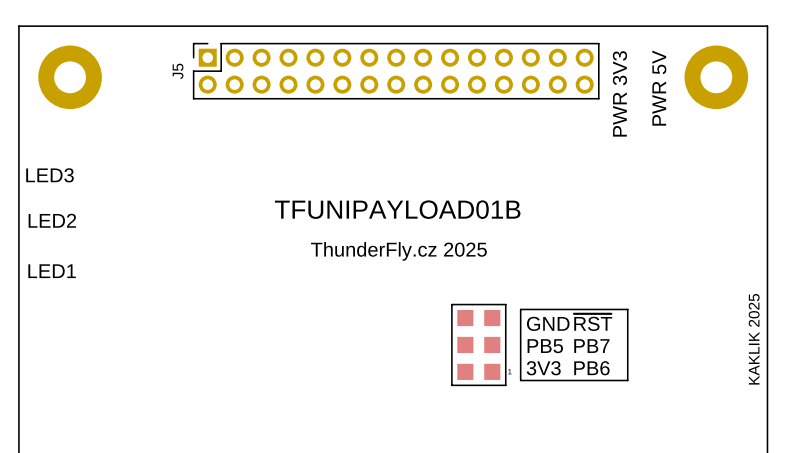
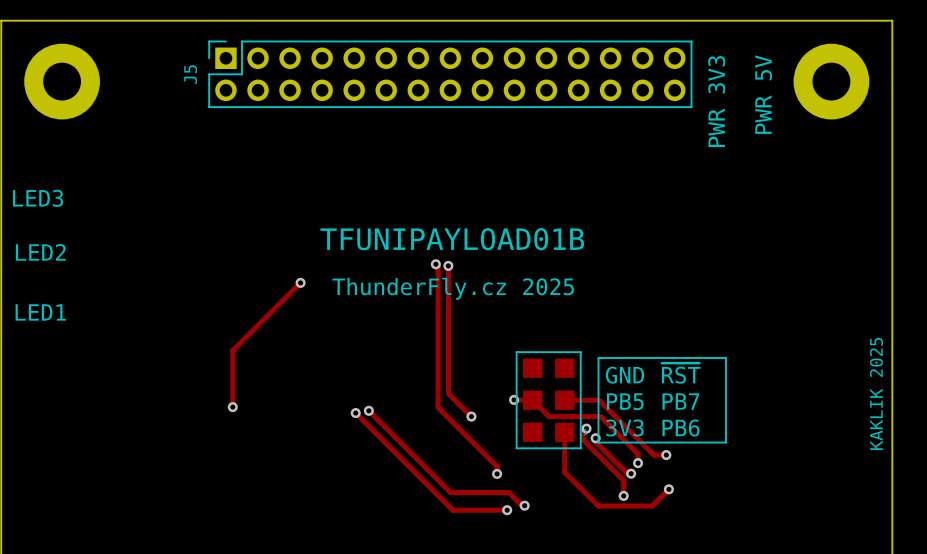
track: none -> (435, 264) (438, 266) (438, 407) (497, 466) (497, 473)
via: none -> (435, 264)
track: none -> (448, 265) (448, 393) (471, 416)
via: none -> (448, 265)
track: none -> (300, 282) (232, 350) (232, 407)
via: none -> (300, 282)
track: none -> (514, 399) (532, 400) (549, 416) (600, 416) (638, 453) (638, 463)
via: none -> (514, 399)
track: none -> (564, 400) (599, 400) (653, 455) (666, 455)
via: none -> (232, 407)
track: none -> (368, 410) (450, 492) (508, 492) (522, 505) (524, 505)
via: none -> (368, 410)
track: none -> (355, 413) (452, 510) (507, 510)
via: none -> (355, 413)
via: none -> (471, 416)
track: none -> (586, 428) (583, 432) (583, 439) (623, 480) (623, 495)
via: none -> (586, 428)
track: none -> (564, 432) (564, 472) (598, 506) (652, 506) (668, 489)
track: none -> (595, 438) (595, 441) (627, 473) (631, 473)
via: none -> (595, 438)
via: none -> (666, 455)
via: none -> (638, 463)
via: none -> (497, 473)
via: none -> (631, 473)
via: none -> (668, 489)
via: none -> (623, 495)
via: none -> (524, 505)
via: none -> (507, 510)

